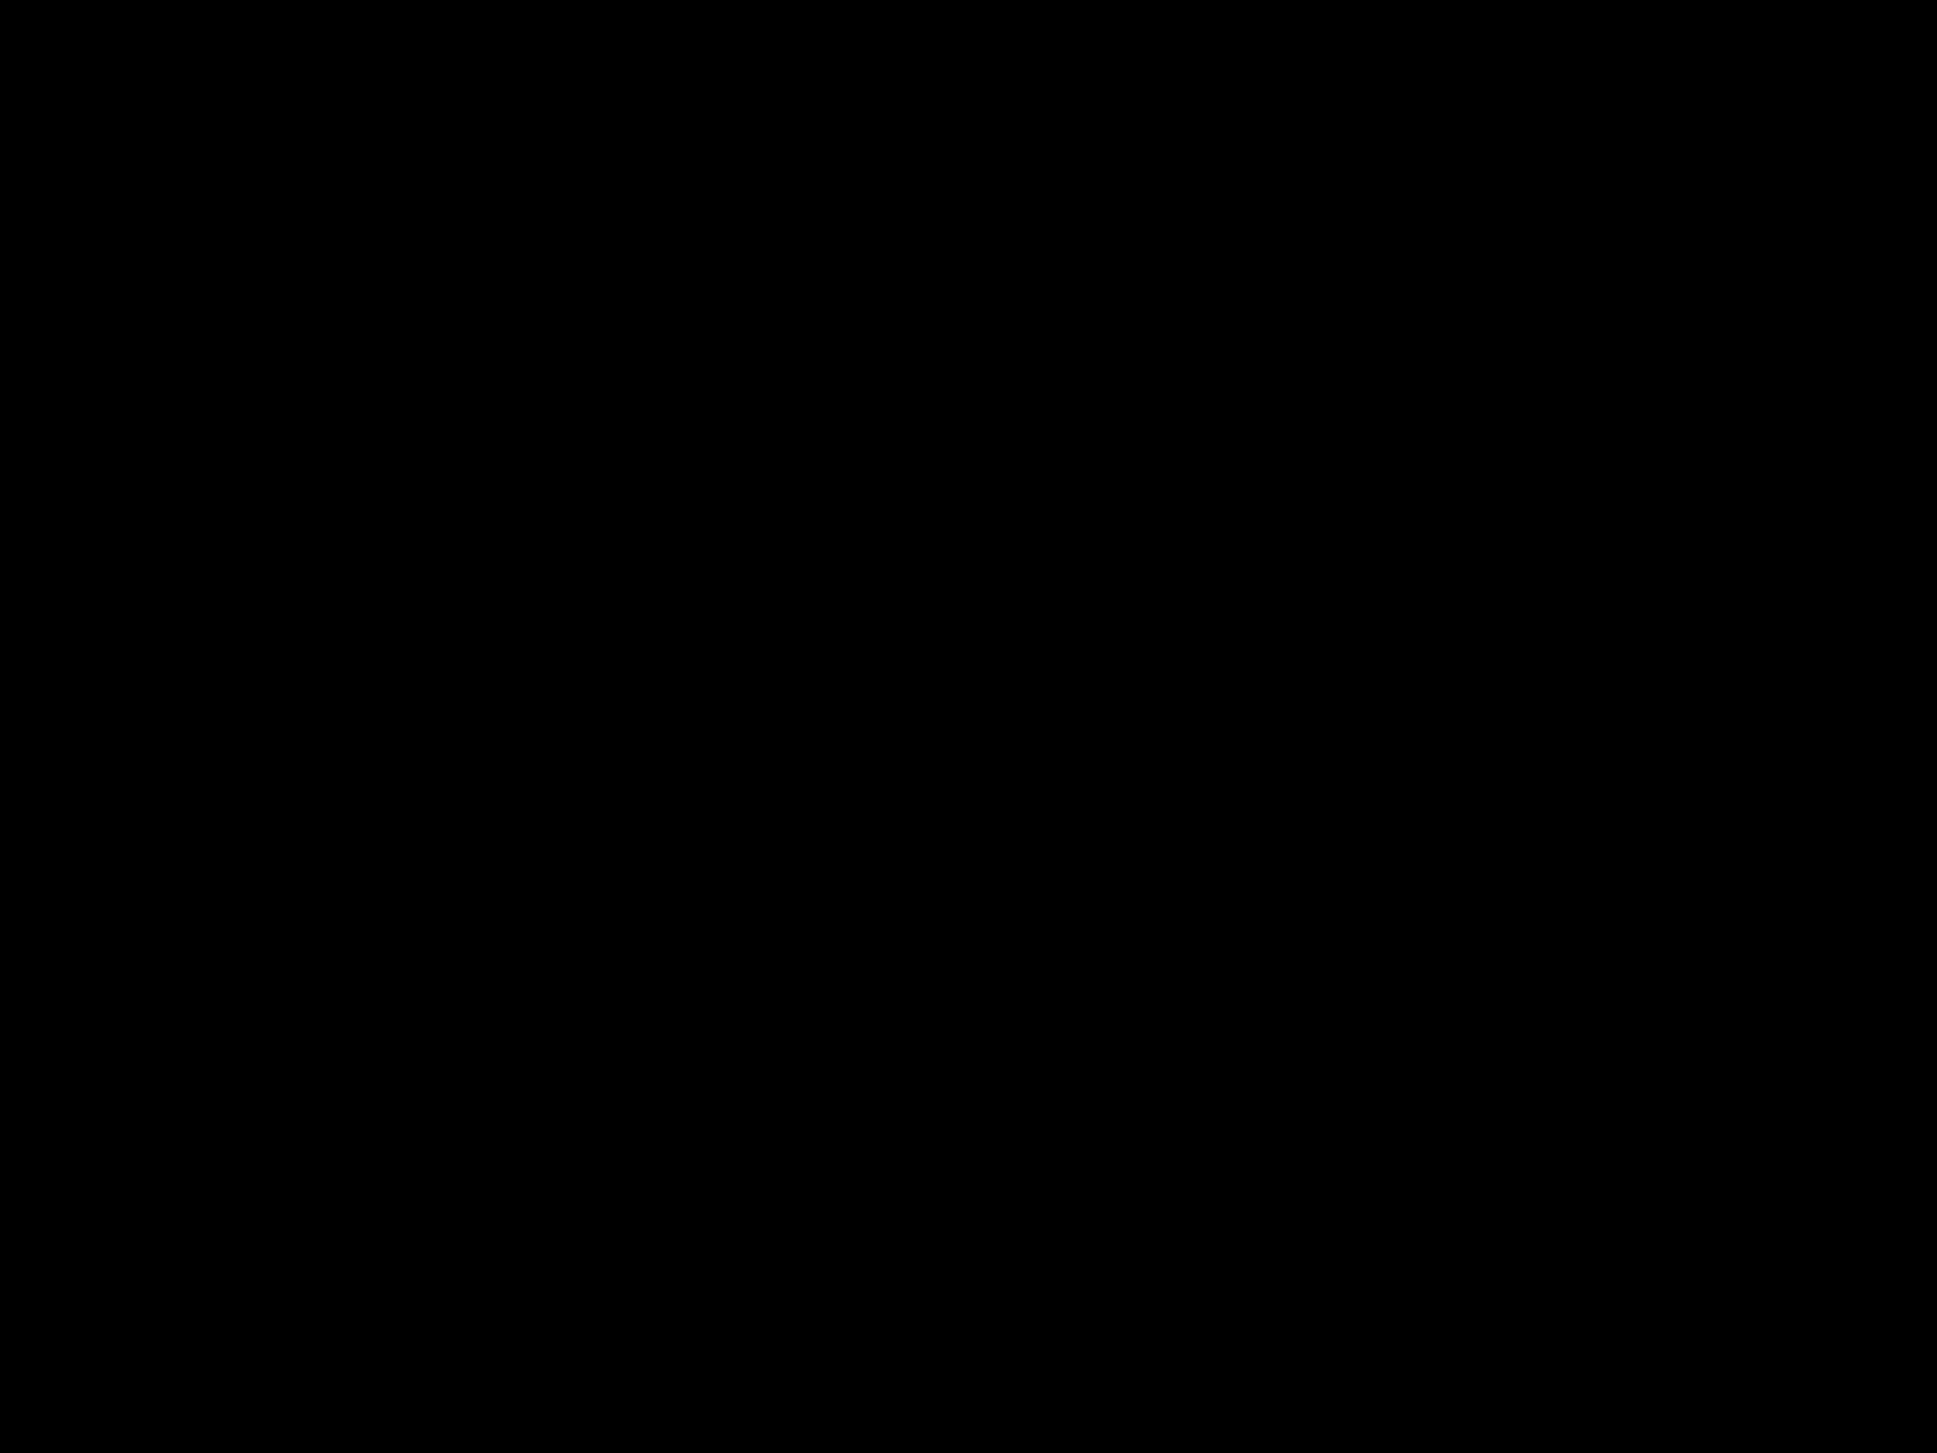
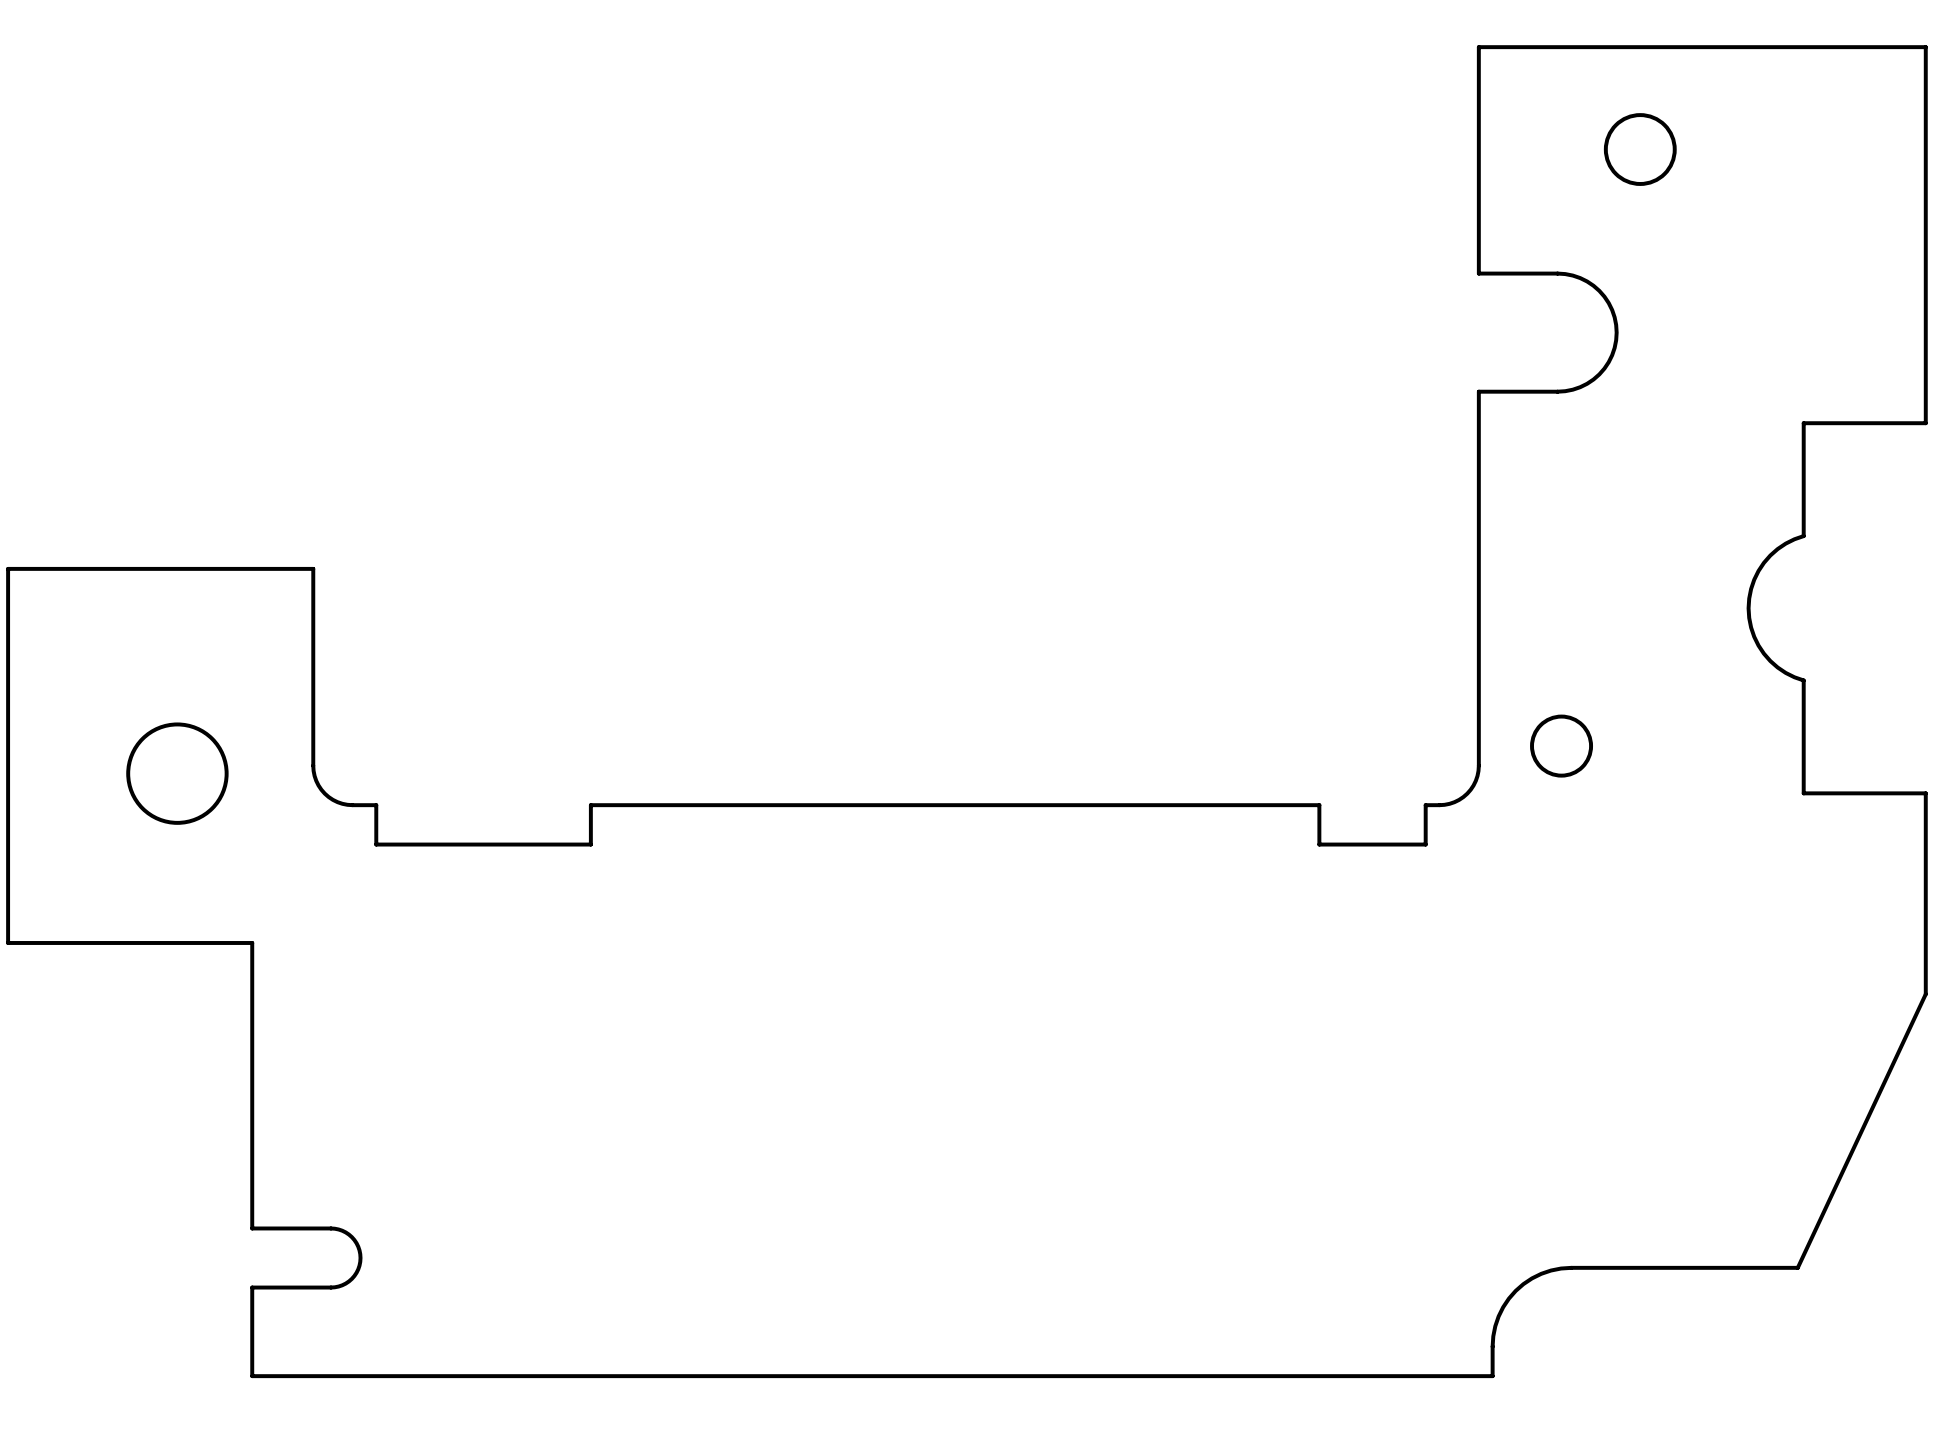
board edge: none -> (1478, 47) (1925, 47) (1925, 423) (1803, 423) (1803, 536) (1785, 543) (1763, 562) (1754, 579) (1749, 598) (1751, 627) (1758, 645) (1777, 667) (1803, 680) (1803, 793) (1925, 793) (1925, 994) (1797, 1267) (1571, 1267) (1541, 1273) (1515, 1290) (1498, 1316) (1493, 1336) (1492, 1376) (252, 1376) (252, 1287) (330, 1287) (342, 1285) (351, 1278) (358, 1269) (360, 1261) (359, 1250) (351, 1237) (338, 1229) (252, 1228) (252, 942) (8, 942) (8, 568) (313, 568) (314, 775) (321, 789) (337, 802) (347, 804) (376, 805) (376, 844) (590, 844) (590, 805) (1319, 805) (1319, 844) (1425, 844) (1425, 805) (1444, 804) (1459, 799) (1470, 789) (1478, 770) (1478, 391) (1557, 391) (1580, 387) (1593, 379) (1604, 368) (1612, 355) (1616, 340) (1616, 324) (1608, 303) (1593, 285) (1580, 278) (1557, 273) (1478, 273) (1478, 47)
round board edge: none -> [1603, 113, 1677, 186]
round board edge: none -> [1530, 714, 1594, 778]
round board edge: none -> [126, 722, 229, 825]

